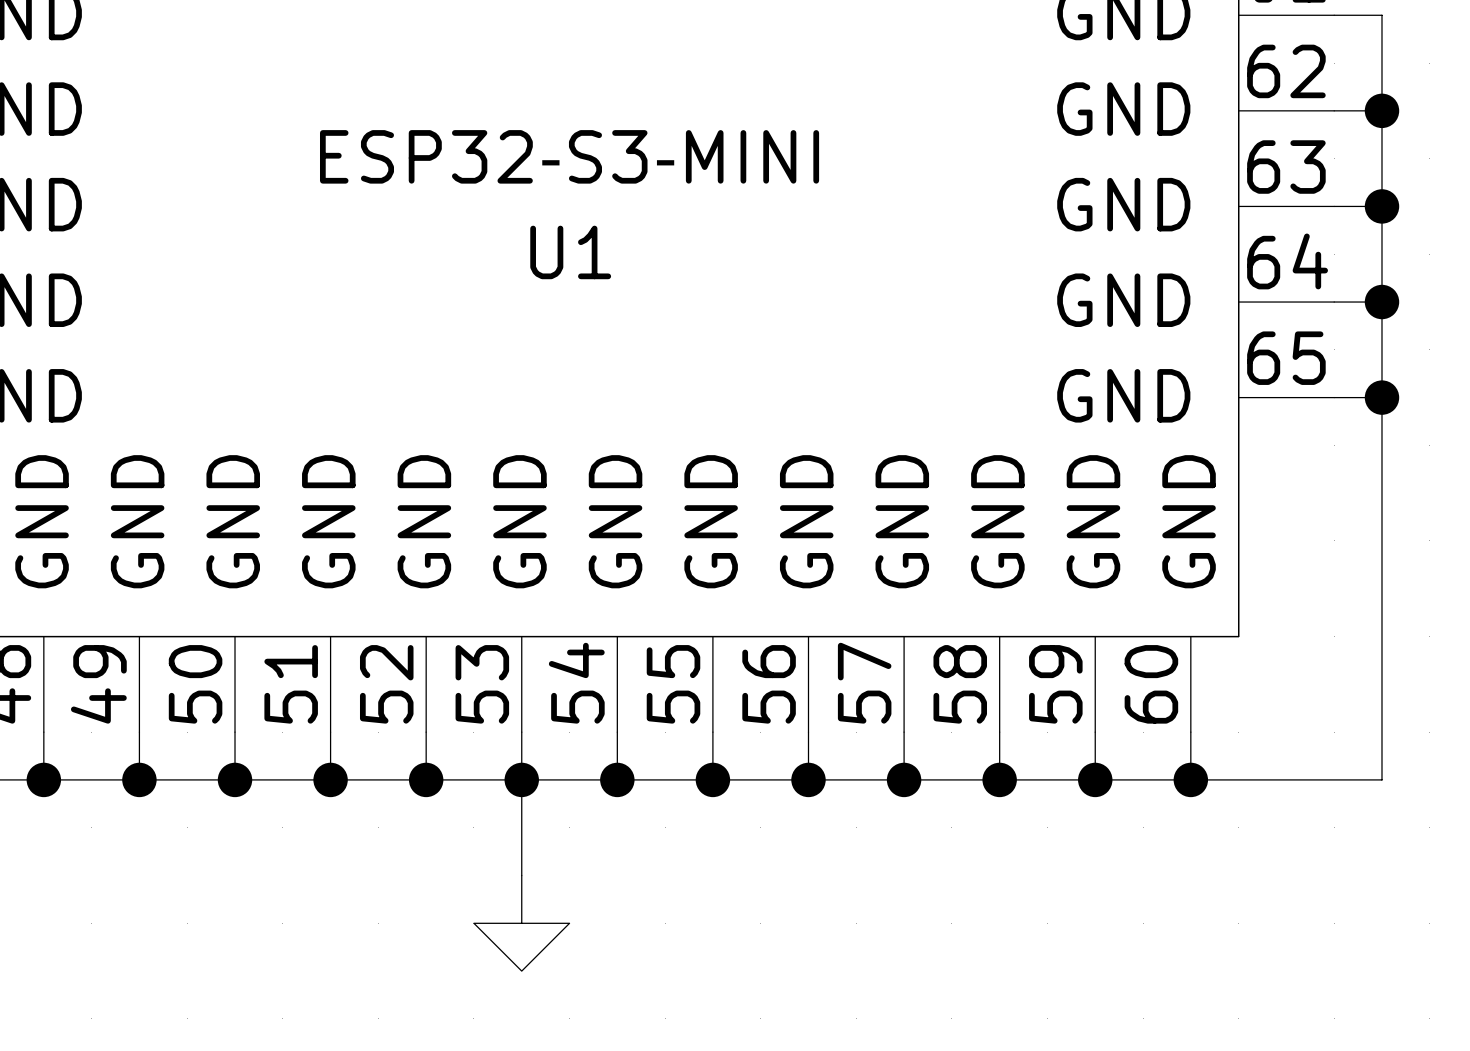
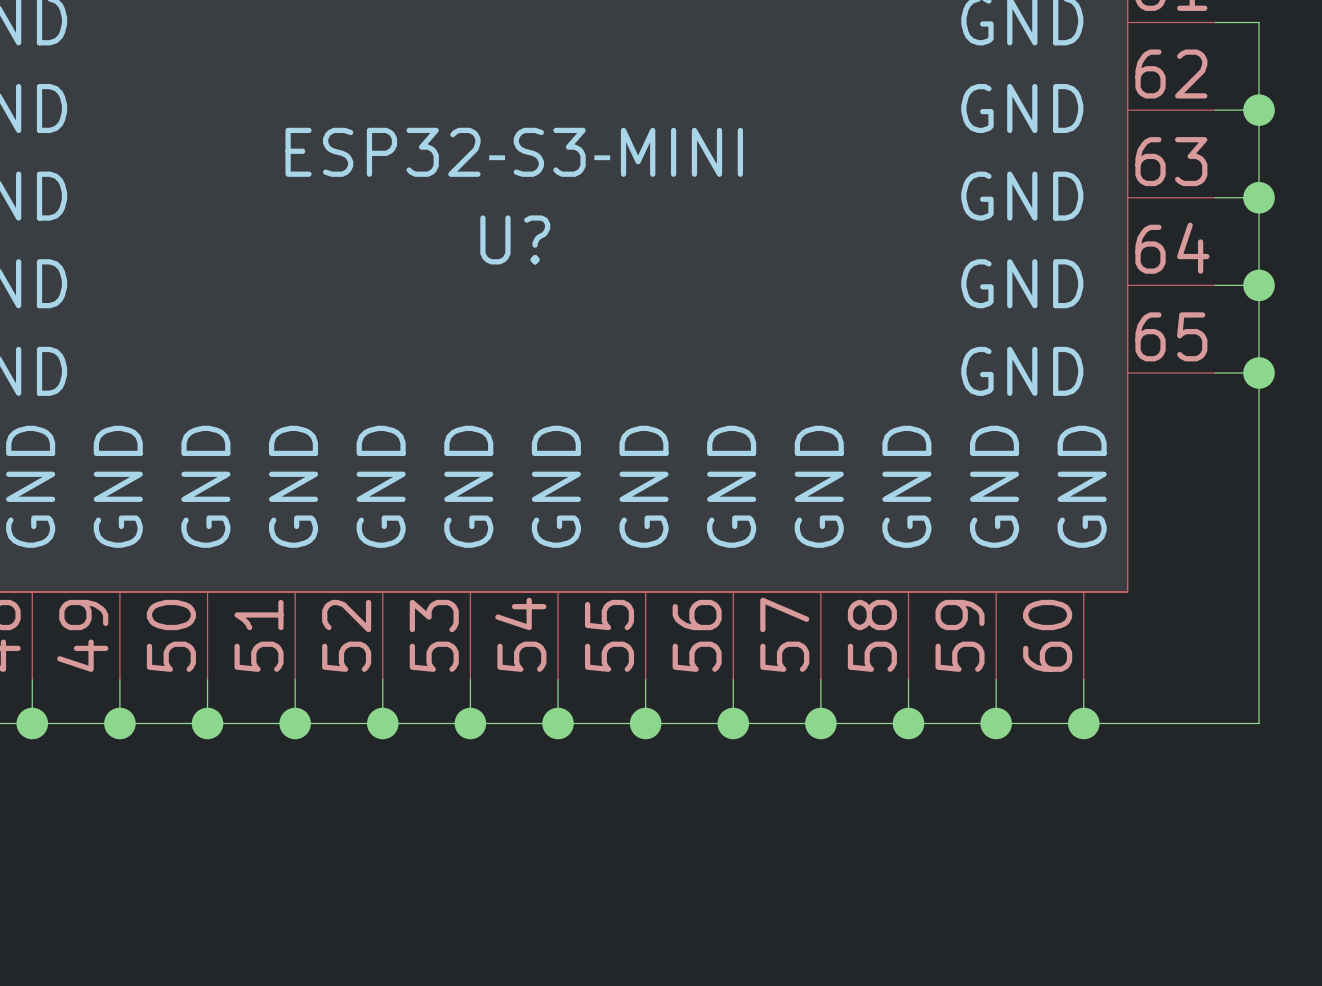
U1 name: U1 (570, 252) -> U? (515, 239)
wire: (521, 779) (521, 875) -> none
power symbol: (521, 923) -> none

